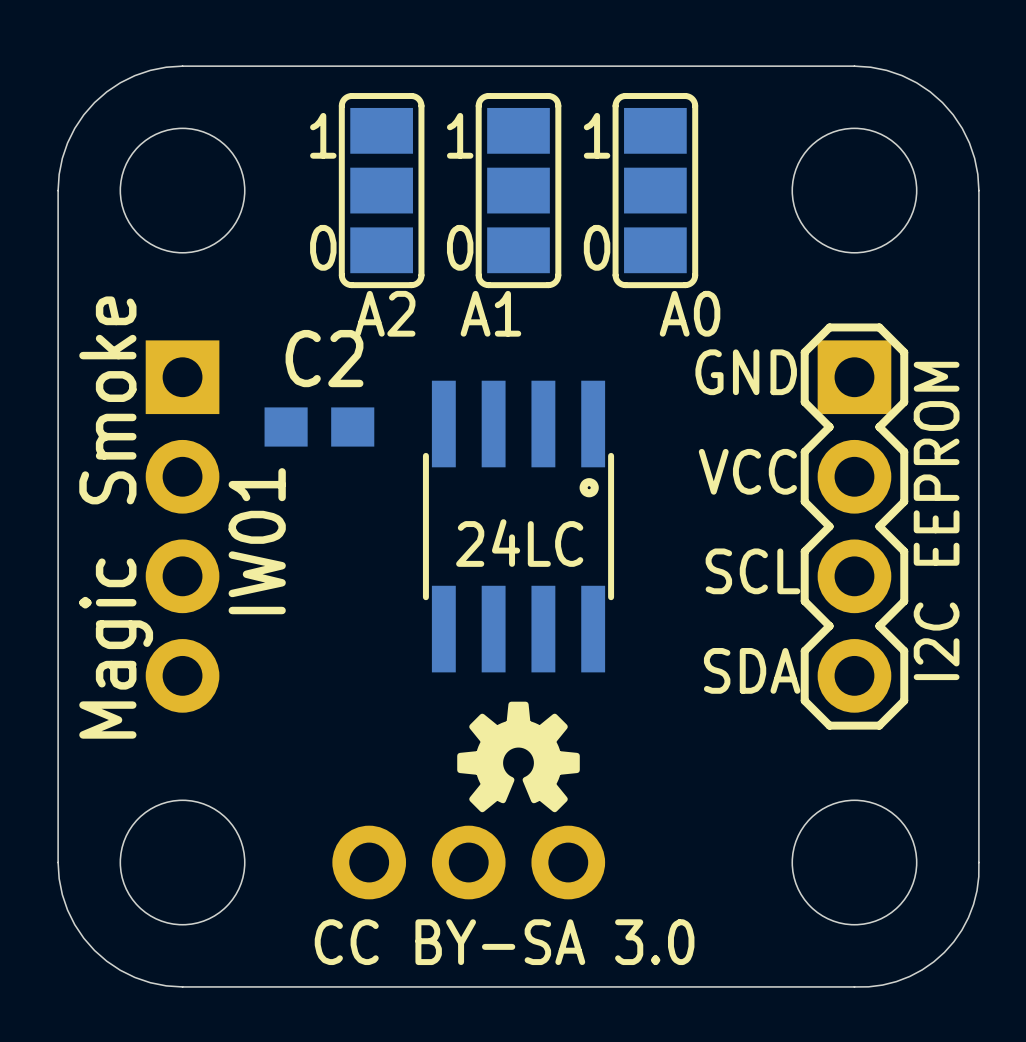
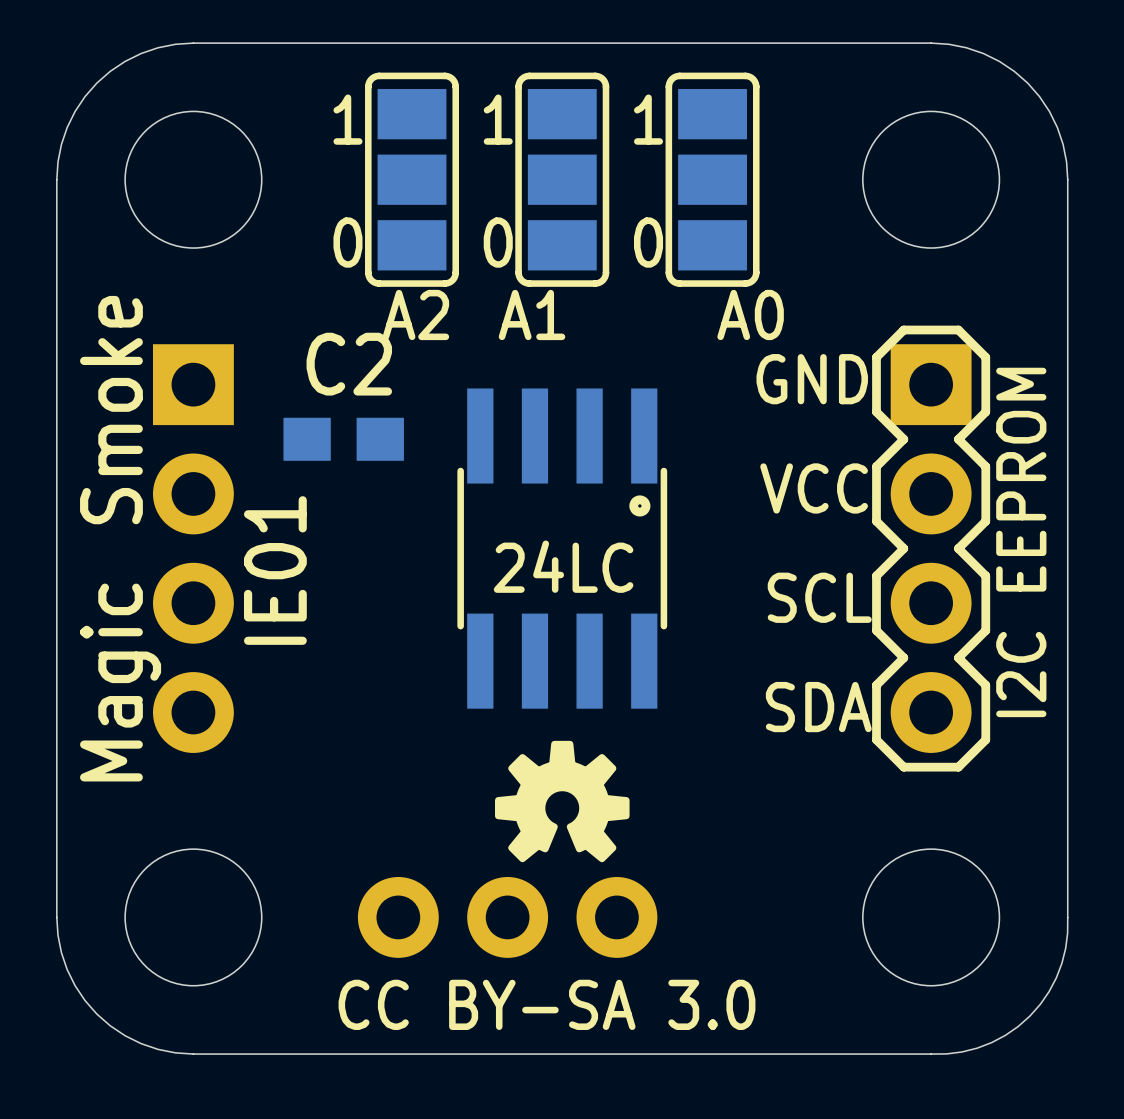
text: IW01 (257, 541) -> IE01 (275, 570)

